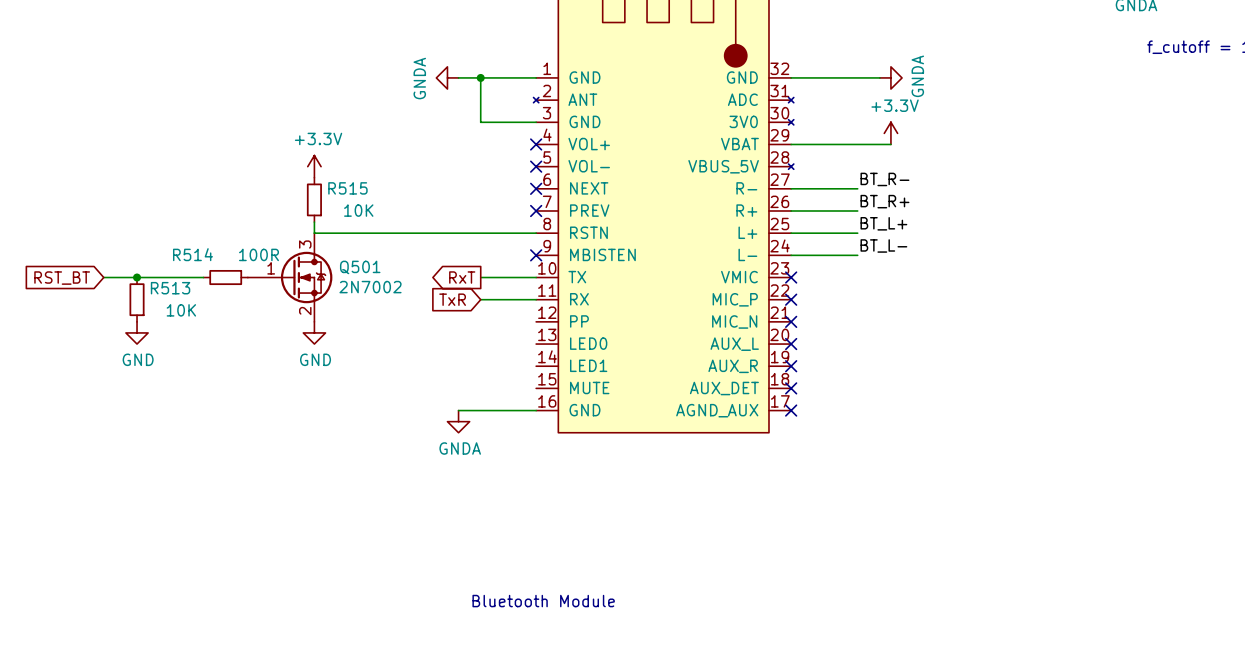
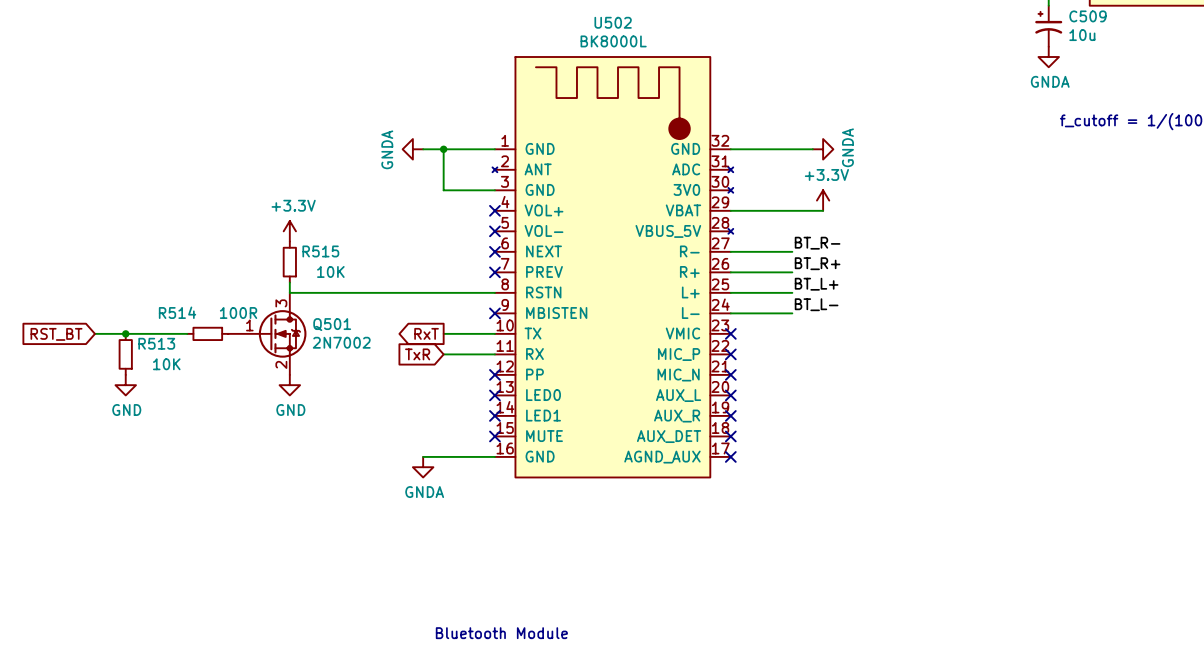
no-connect mark: none -> (494, 374)
no-connect mark: none -> (494, 395)
no-connect mark: none -> (494, 415)
no-connect mark: none -> (494, 436)

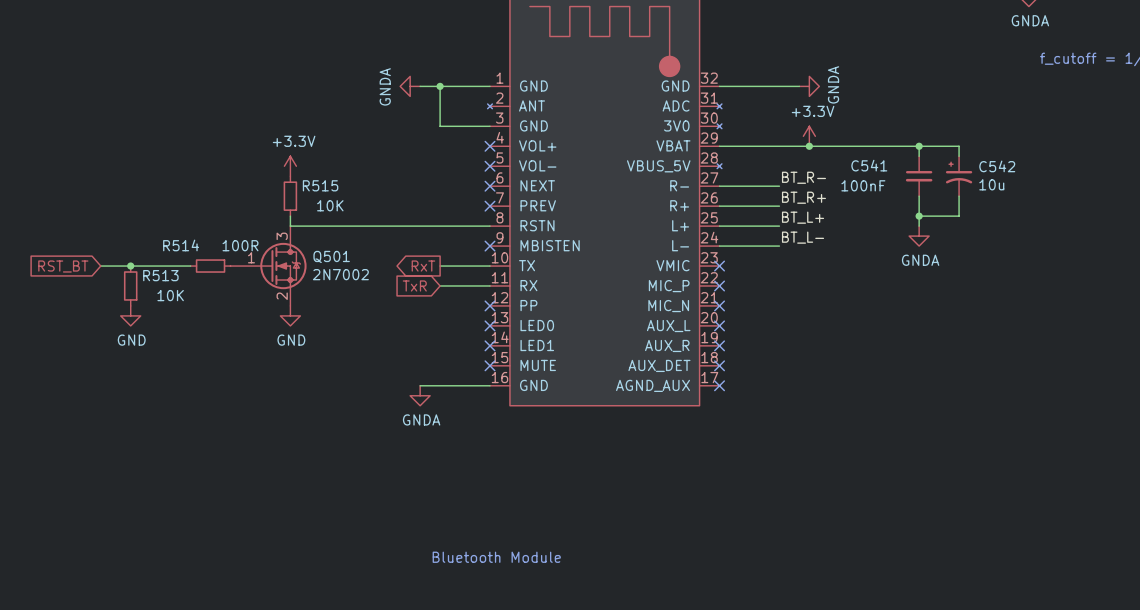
wire: none -> (809, 146) (959, 146) (959, 156)
junction: none -> (809, 146)
wire: none -> (919, 146) (919, 156)
junction: none -> (919, 146)
C541: none -> 100nF (919, 176)
C542: none -> 10u (959, 176)
wire: none -> (919, 196) (919, 226)
wire: none -> (959, 196) (959, 216) (919, 216)
junction: none -> (919, 216)
power symbol: none -> GNDA (919, 236)

